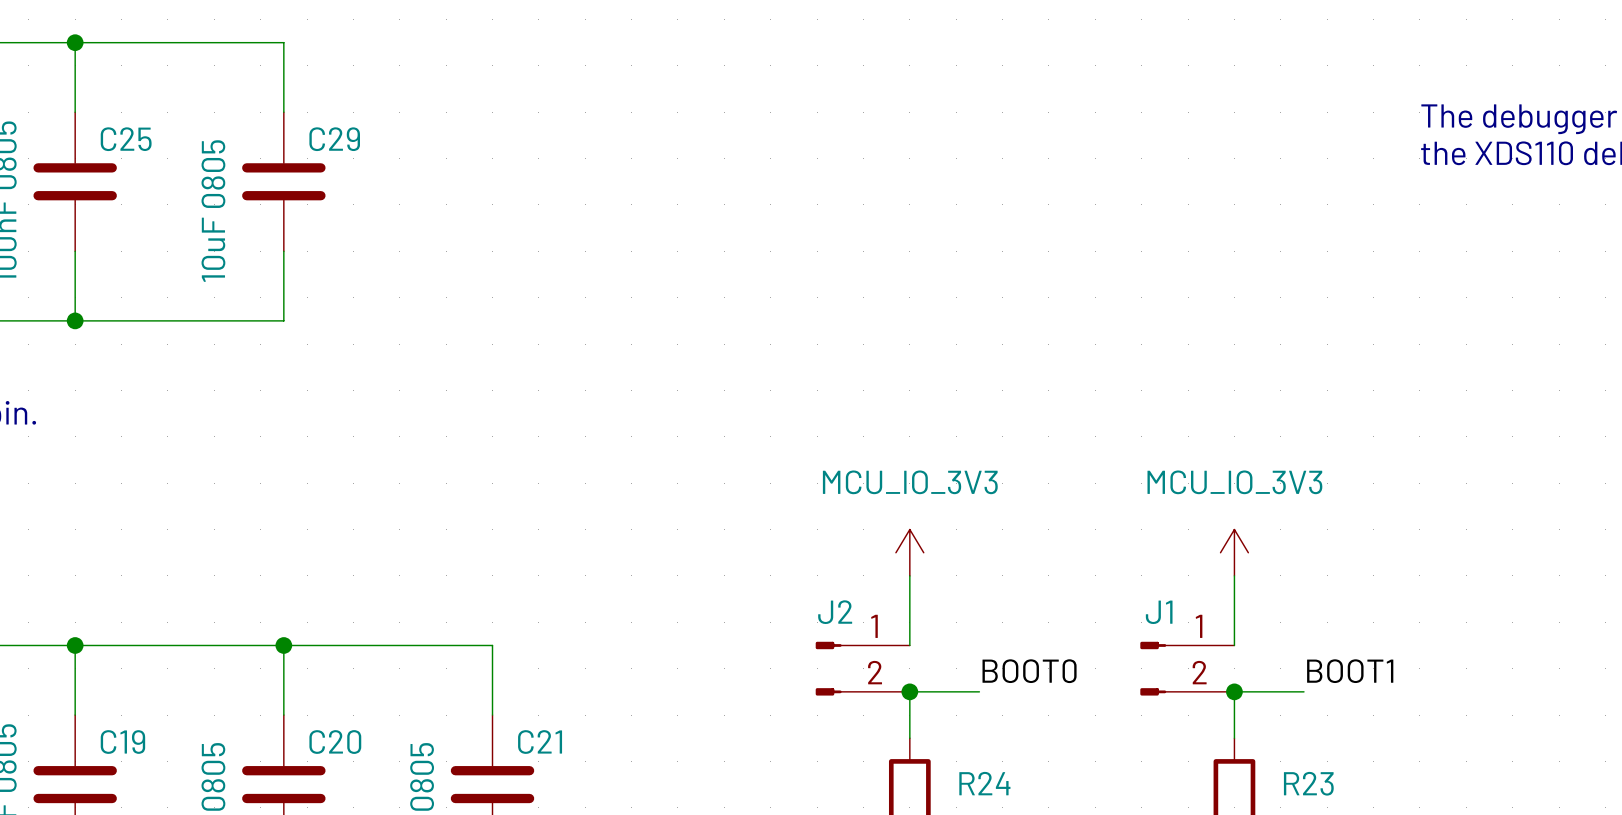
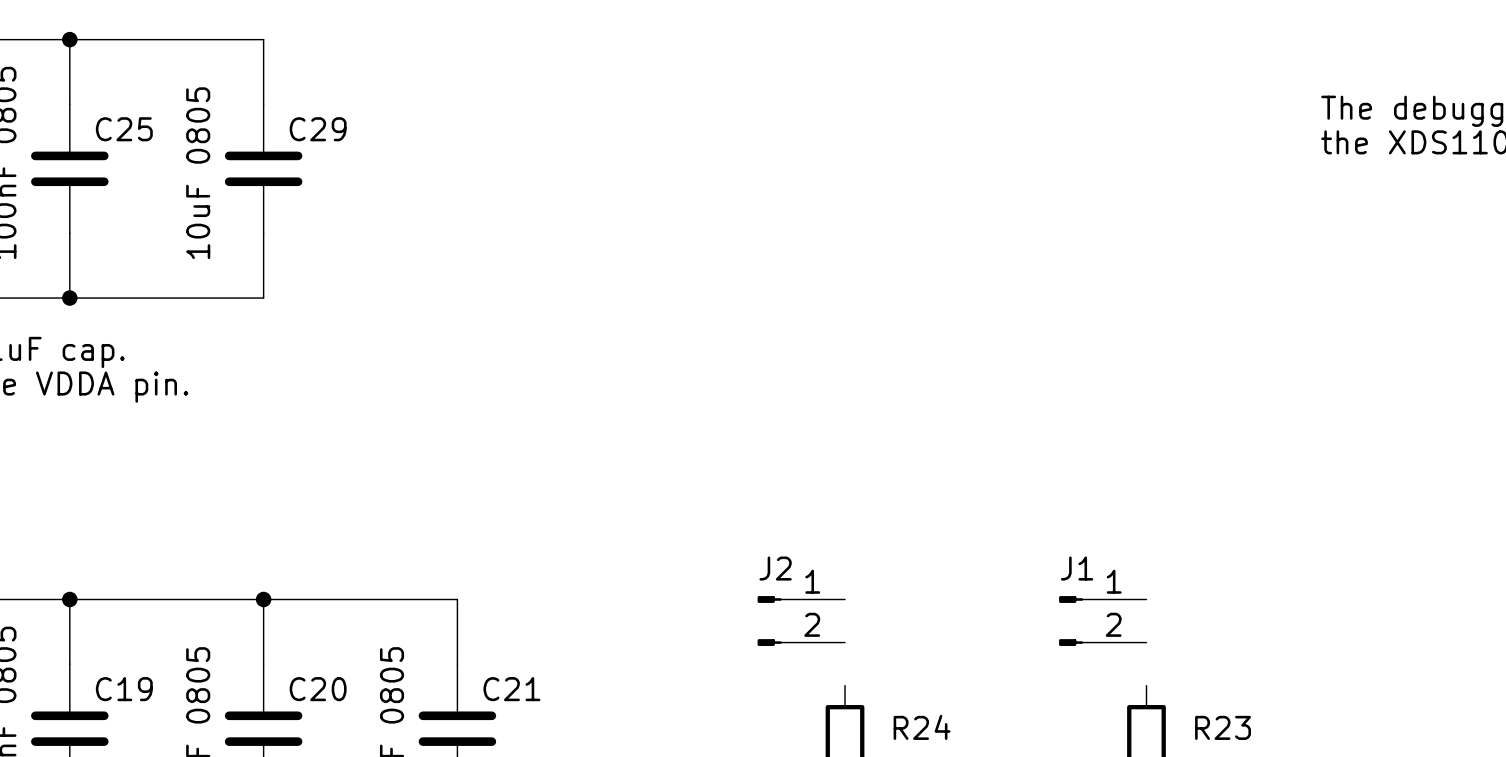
power symbol: MCU_IO_3V3 (909, 552) -> none
power symbol: MCU_IO_3V3 (1234, 552) -> none
wire: (909, 575) (909, 645) -> none
wire: (1234, 575) (1234, 645) -> none
label: BOOT0 (1029, 671) -> none
label: BOOT1 (1350, 671) -> none
junction: (909, 691) -> none
wire: (979, 691) (909, 691) (909, 738) -> none
junction: (1234, 691) -> none
wire: (1303, 691) (1234, 691) (1234, 738) -> none

